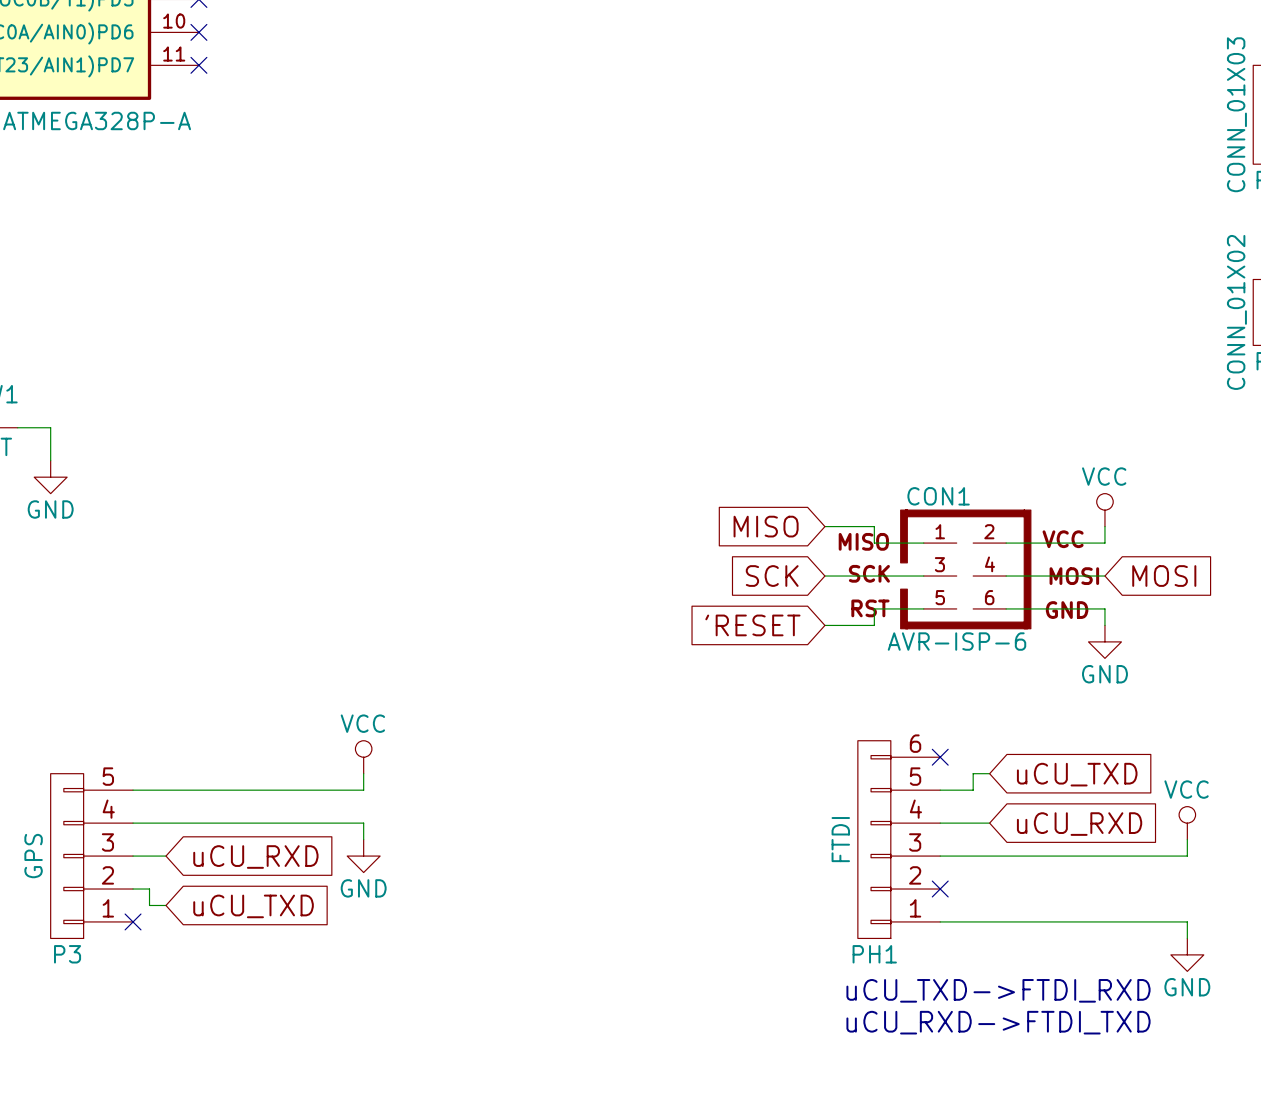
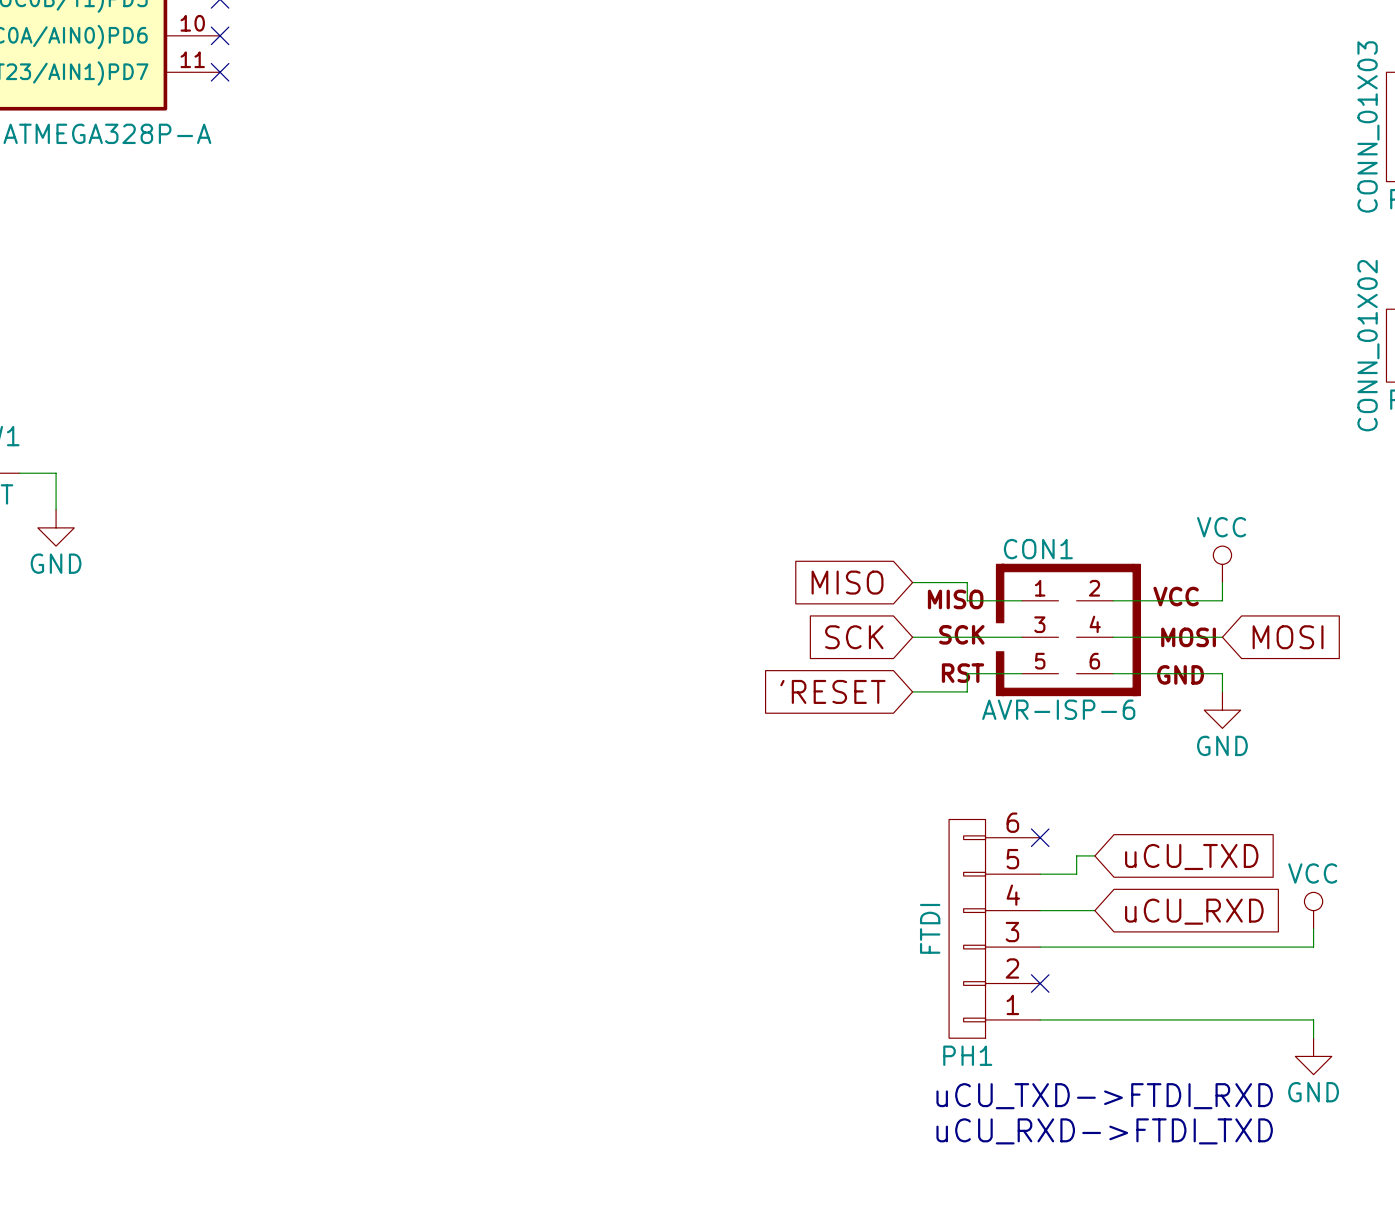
power symbol: VCC (363, 757) -> none
wire: (363, 773) (363, 790) (133, 790) -> none
wire: (133, 823) (363, 823) (363, 839) -> none
P3: GPS (91, 856) -> none
wire: (133, 856) (165, 856) -> none
power symbol: GND (363, 856) -> none
global label: uCU_RXD (255, 857) -> none
wire: (133, 889) (149, 889) (149, 905) (165, 905) -> none
global label: uCU_TXD (253, 906) -> none
no-connect mark: (133, 921) -> none

